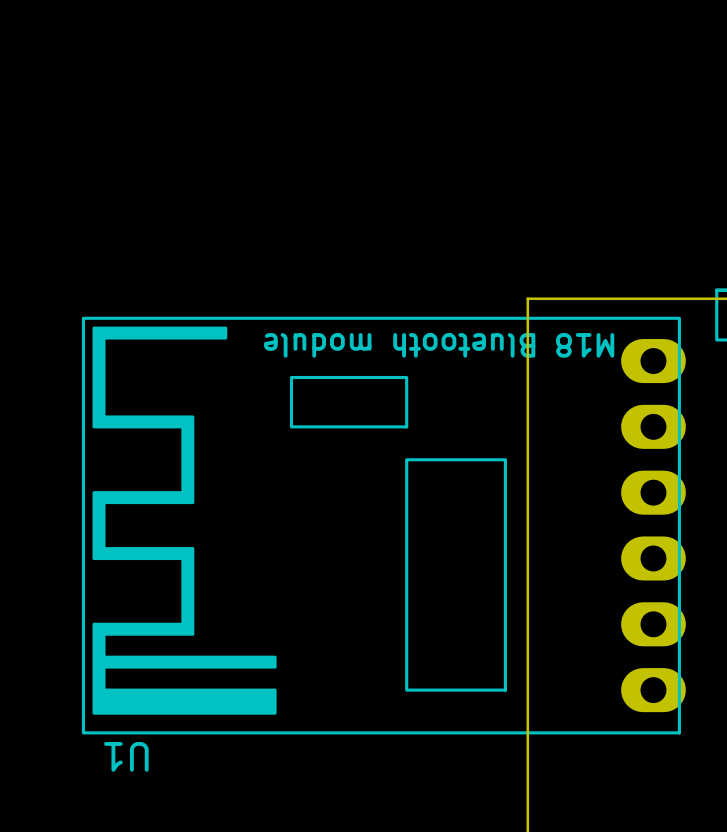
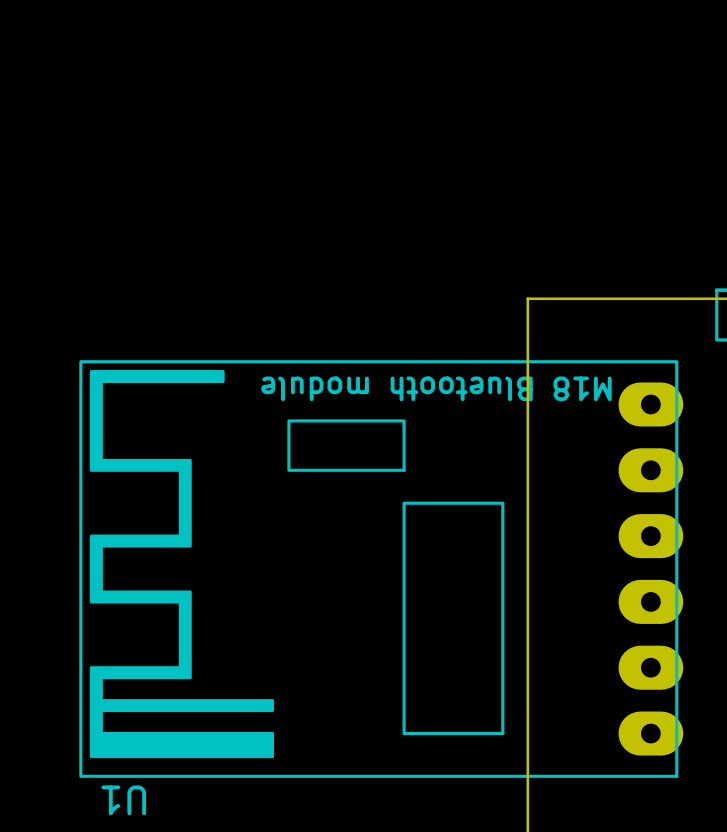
U1 footprint: [81, 316, 686, 735] -> [79, 360, 684, 778]

